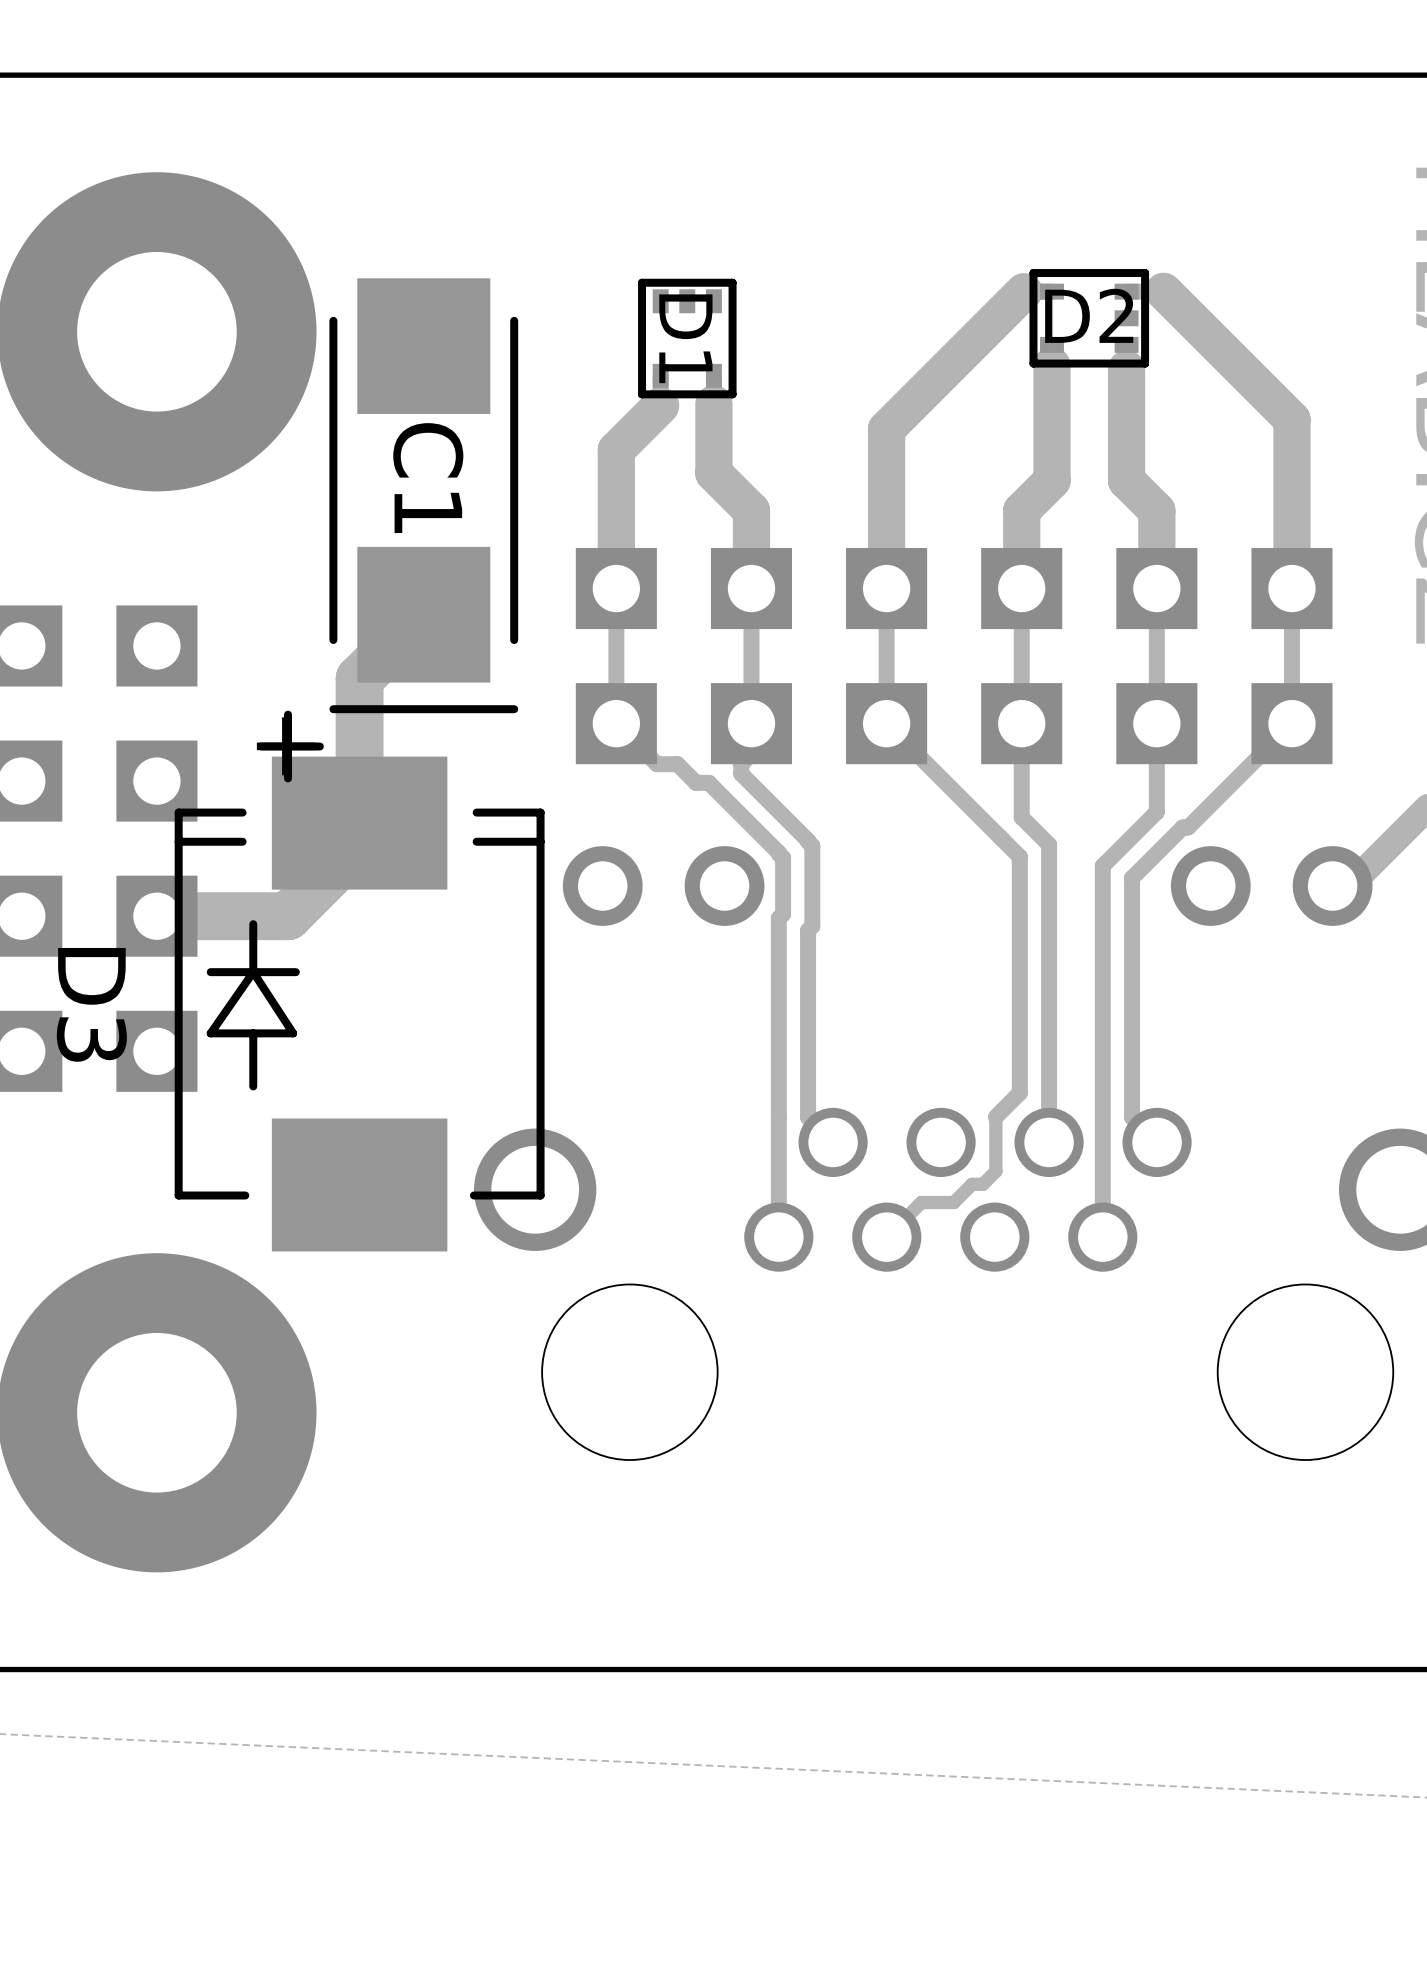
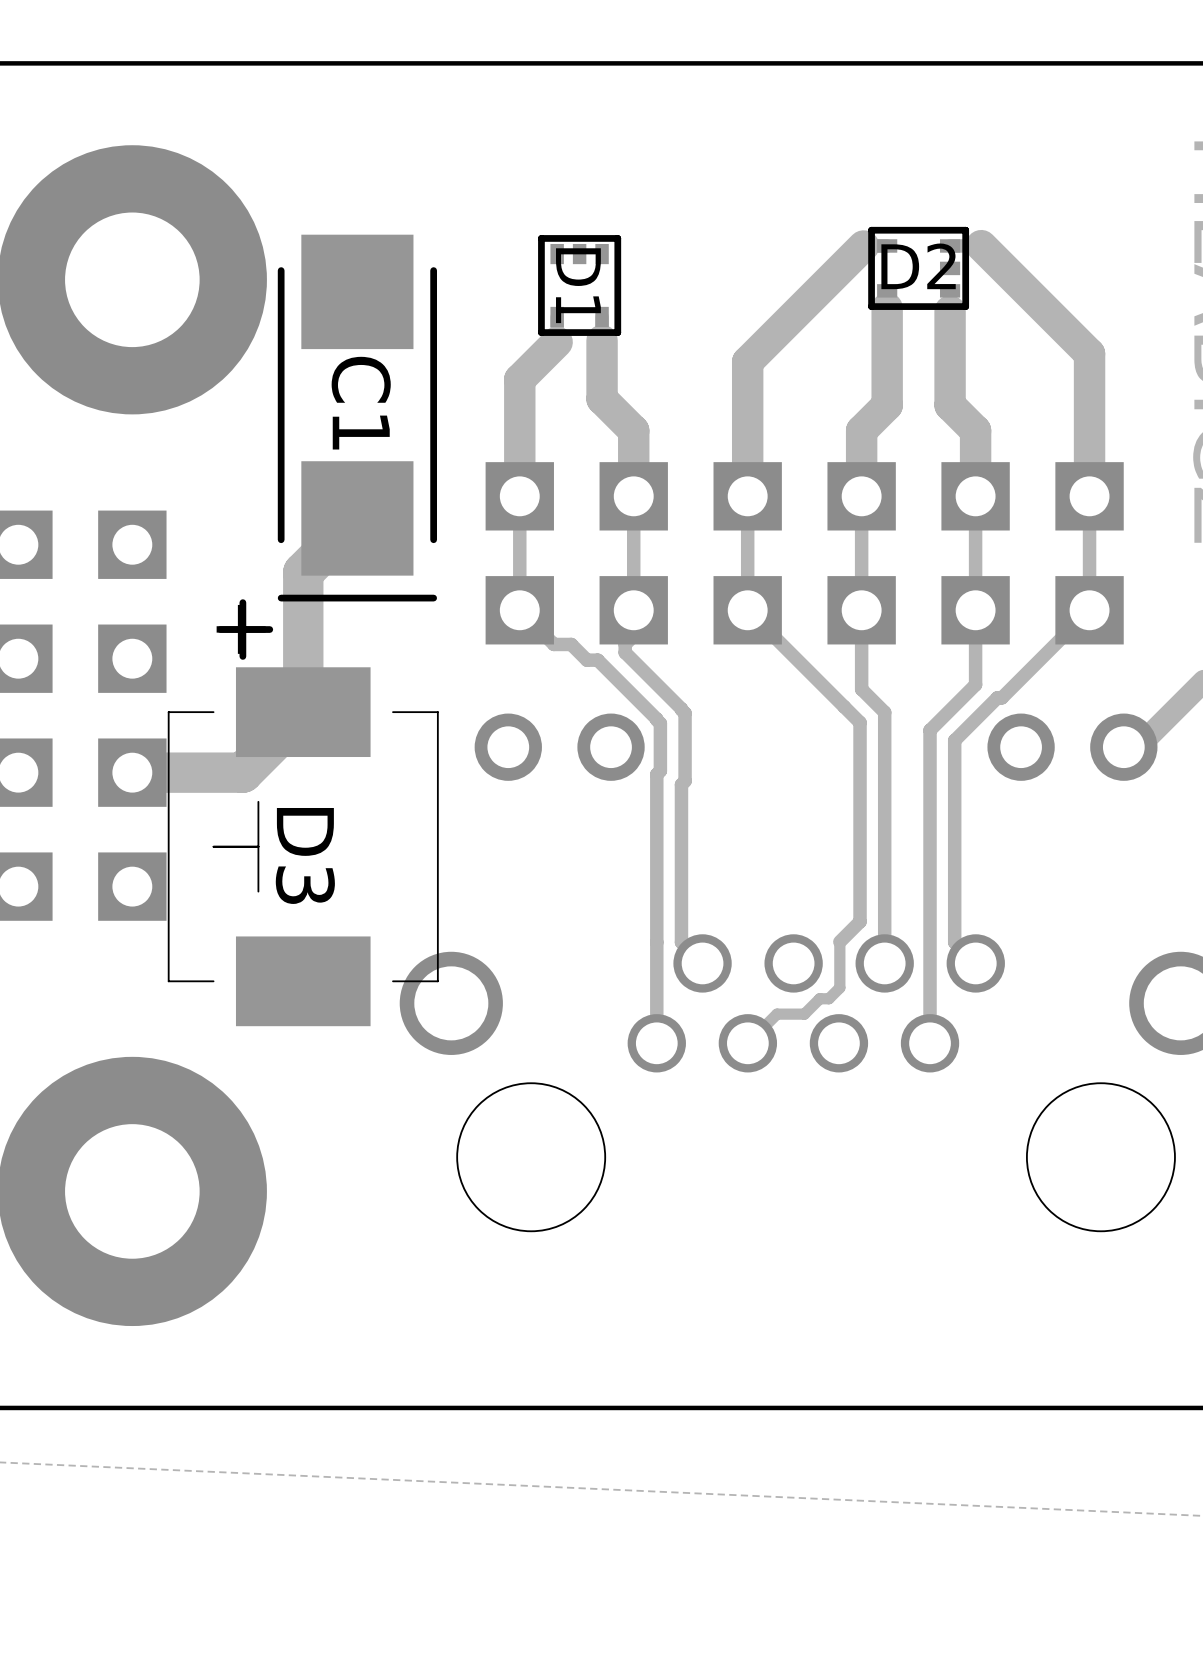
D3 footprint: [174, 756, 545, 1252] -> [168, 667, 438, 1027]
D3 name position: D3 (91, 1004) -> D3 (305, 855)

